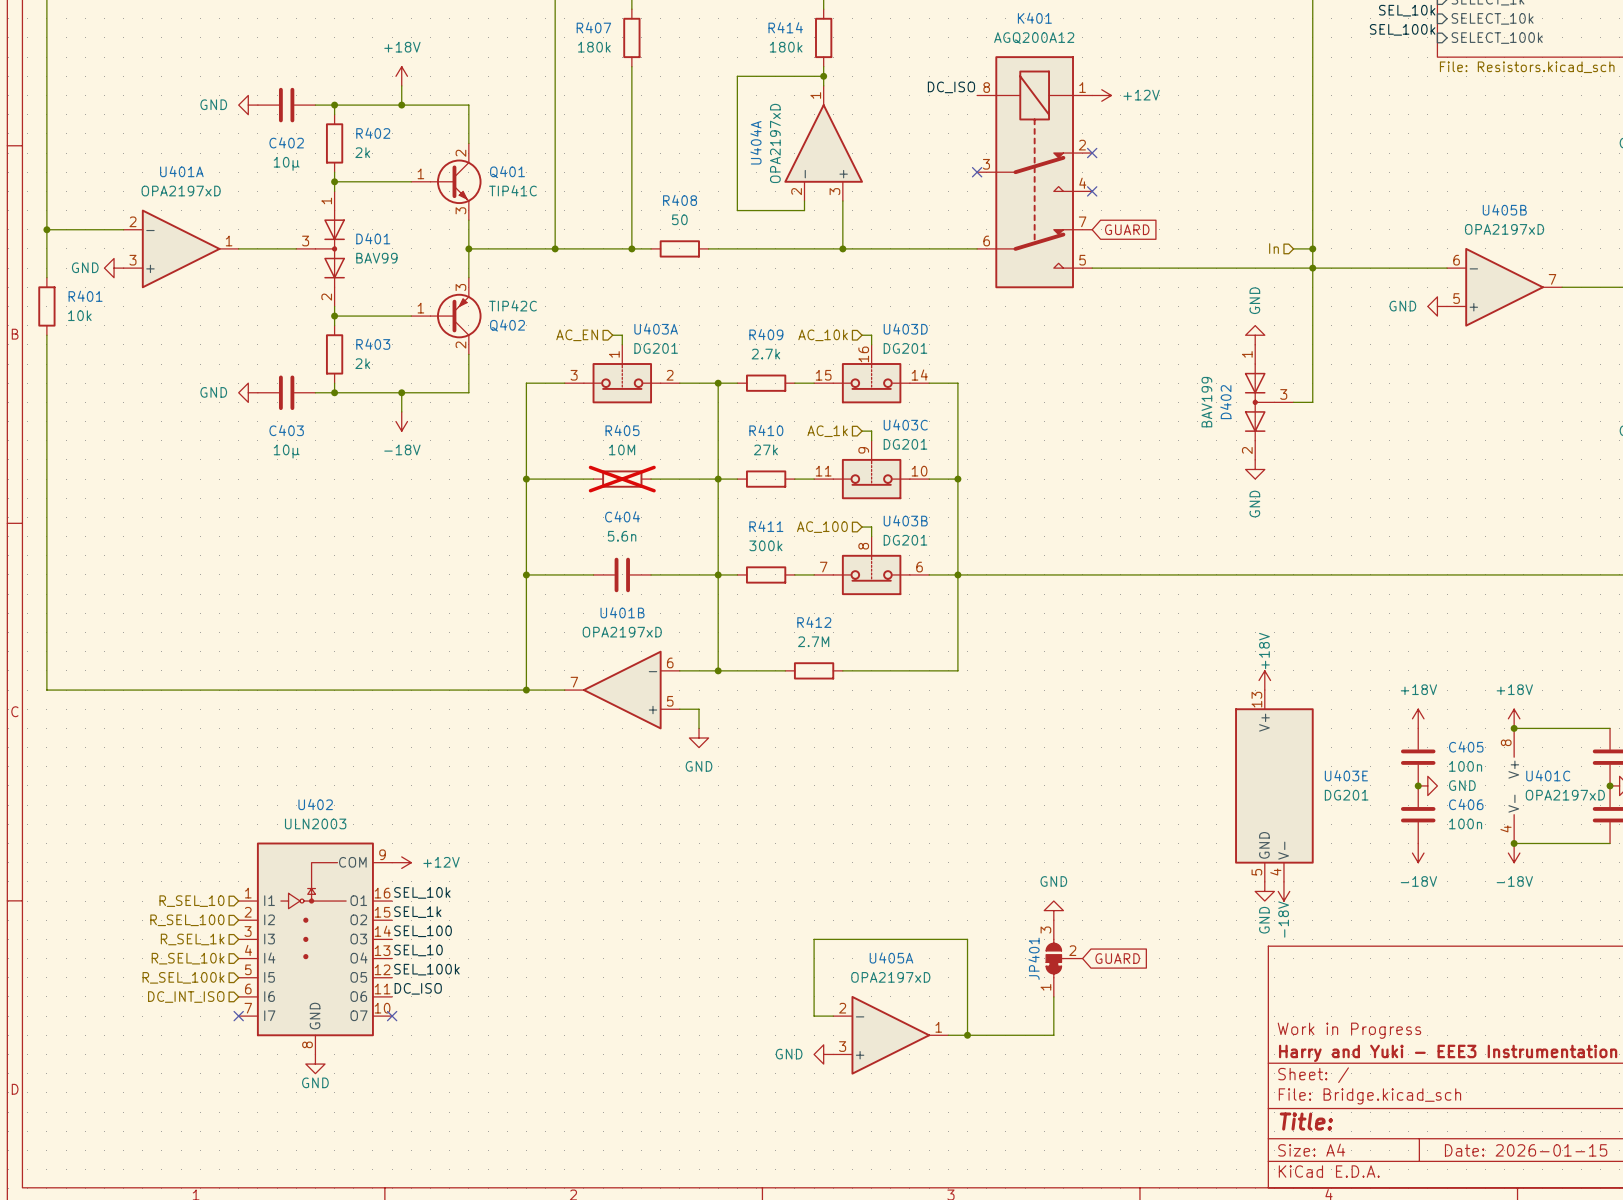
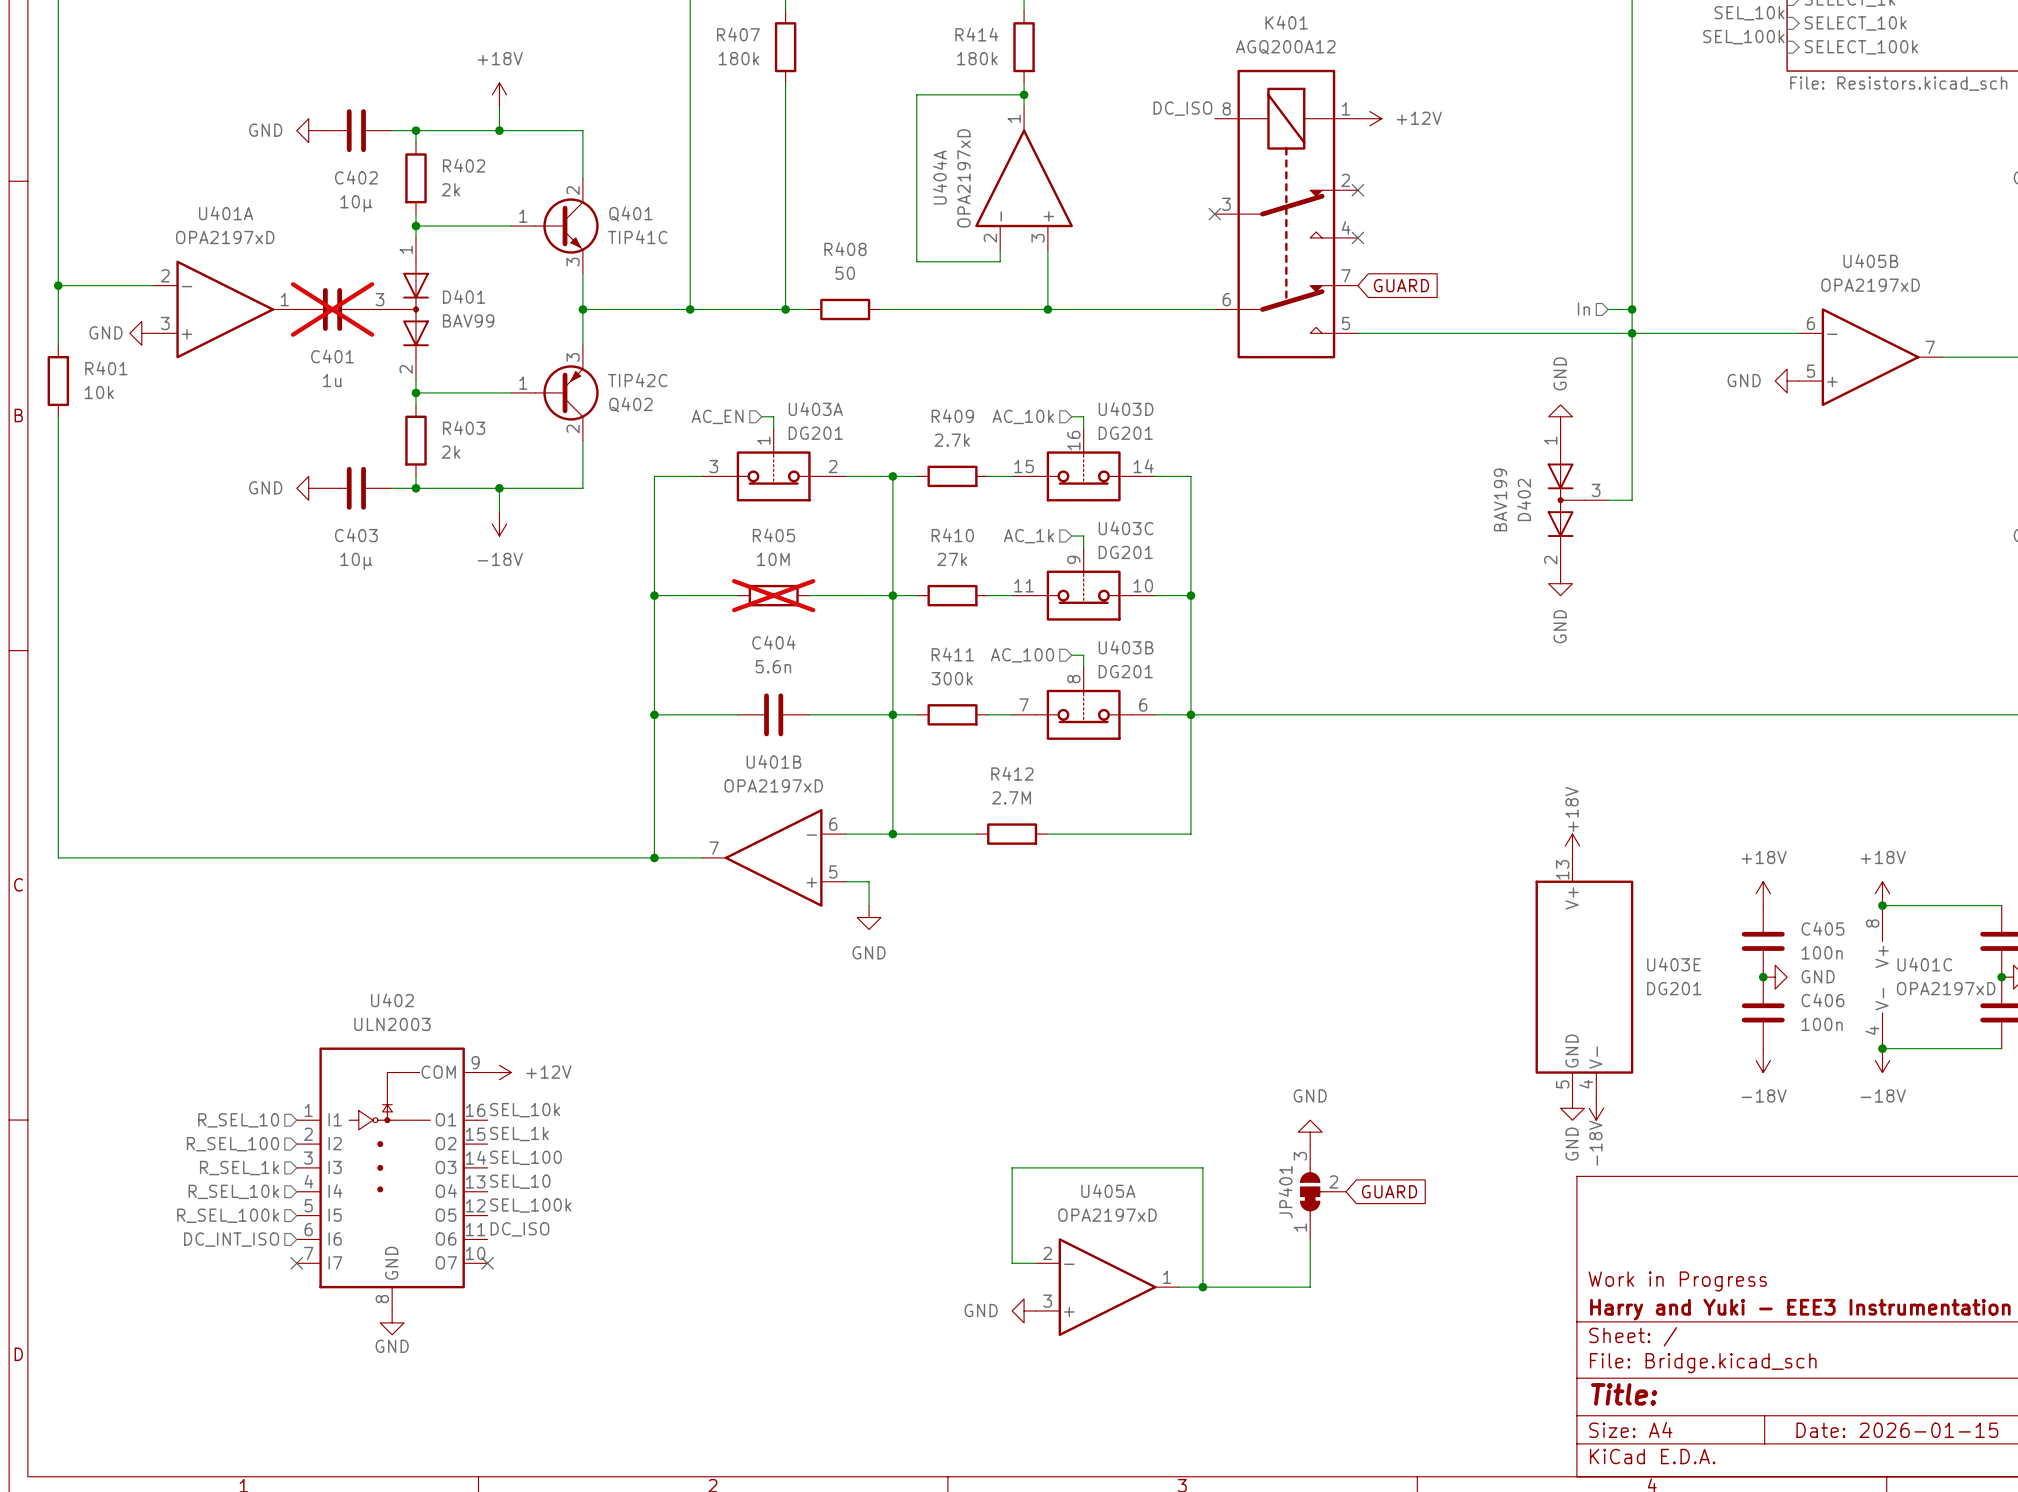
C401: none -> 1u (332, 309)

